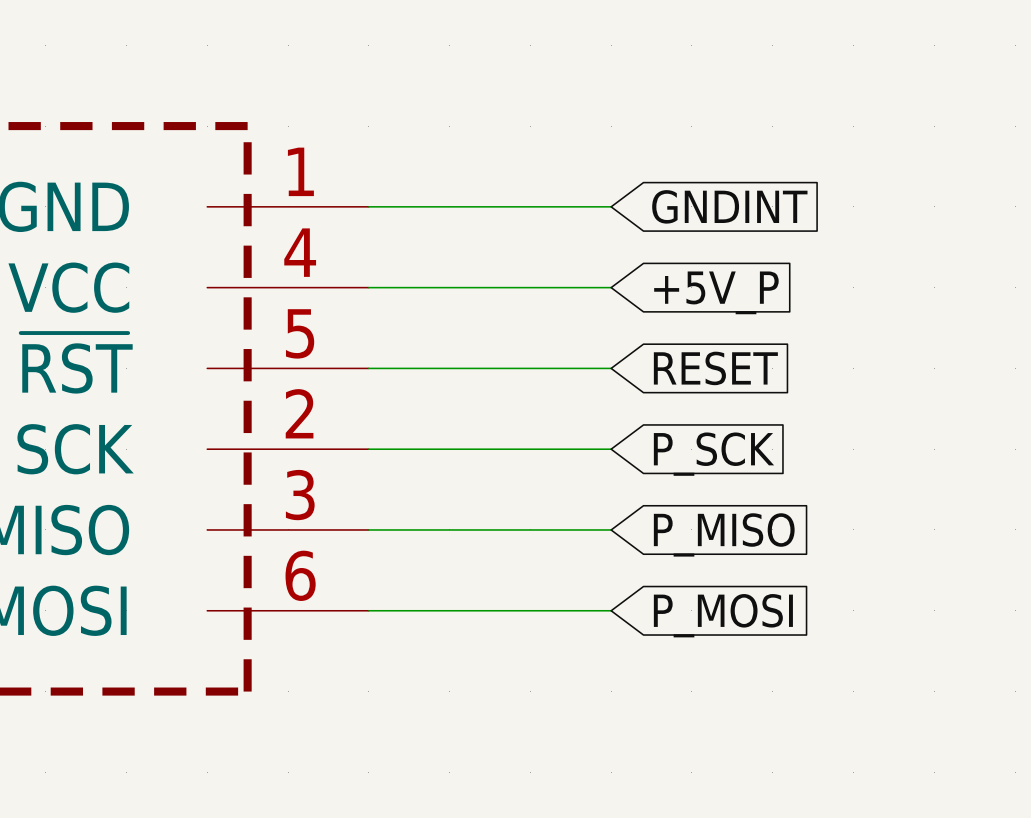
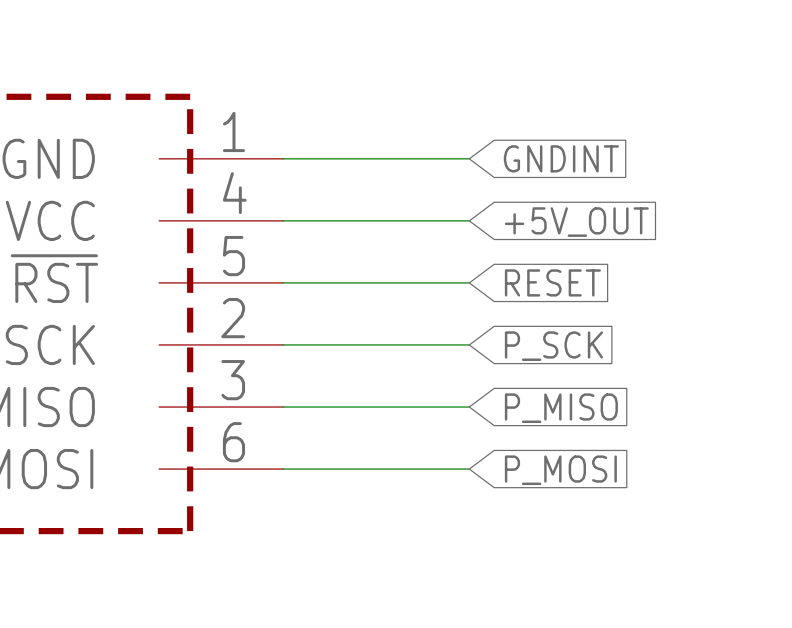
global label: +5V_P (716, 292) -> +5V_OUT (576, 222)

